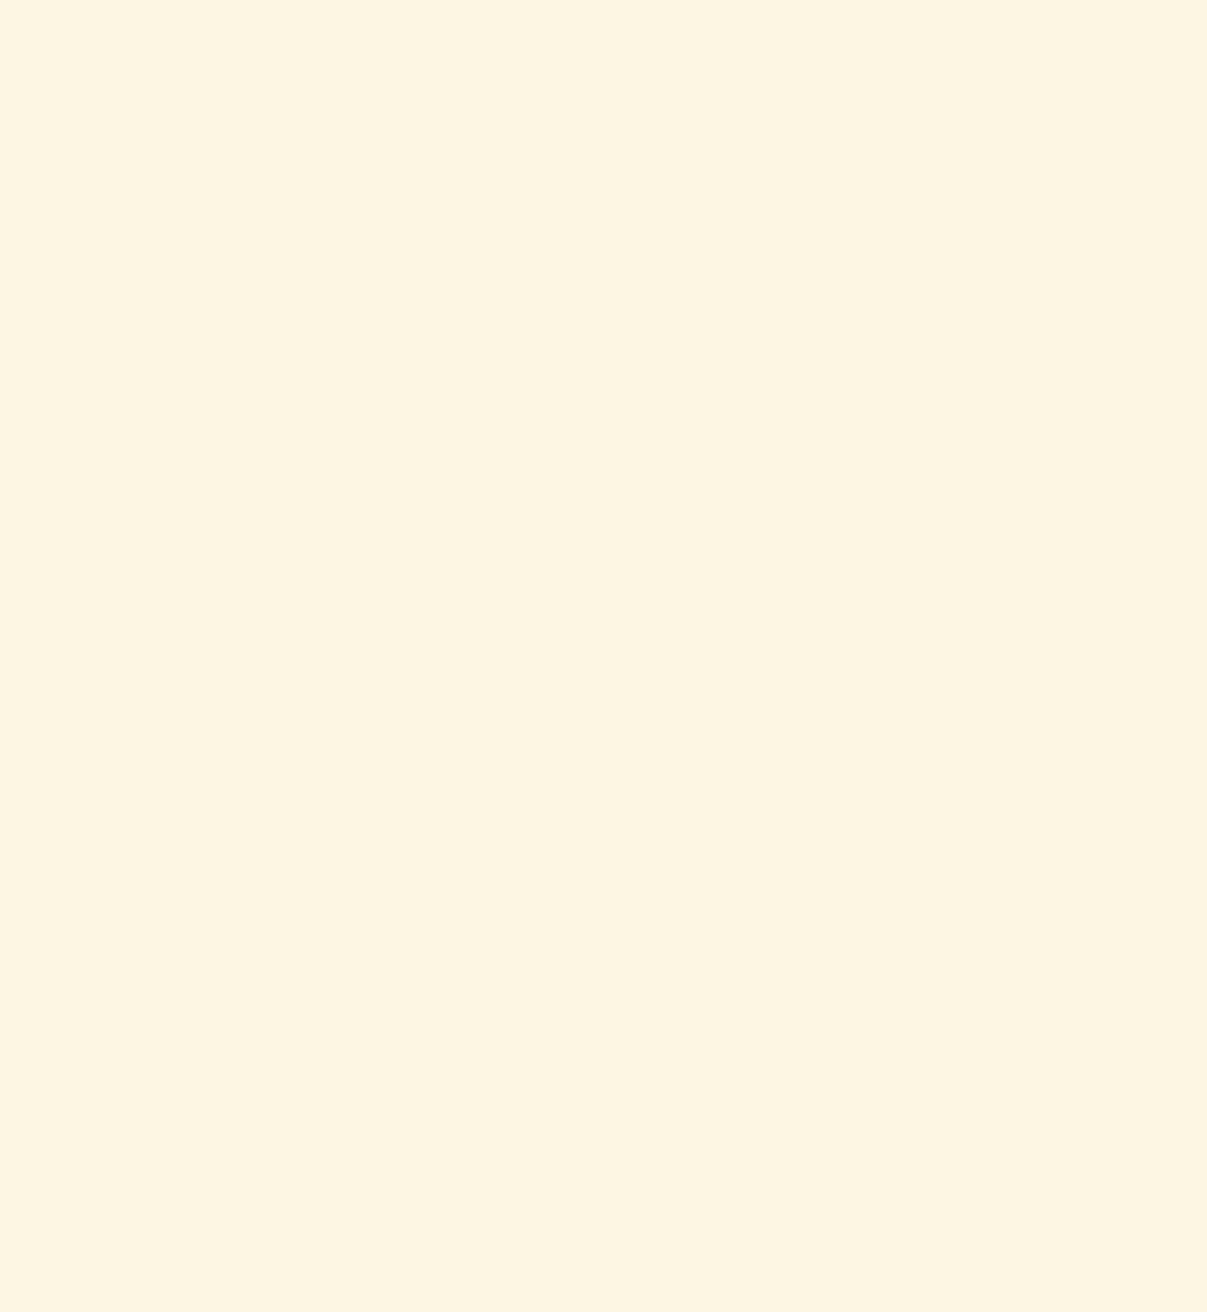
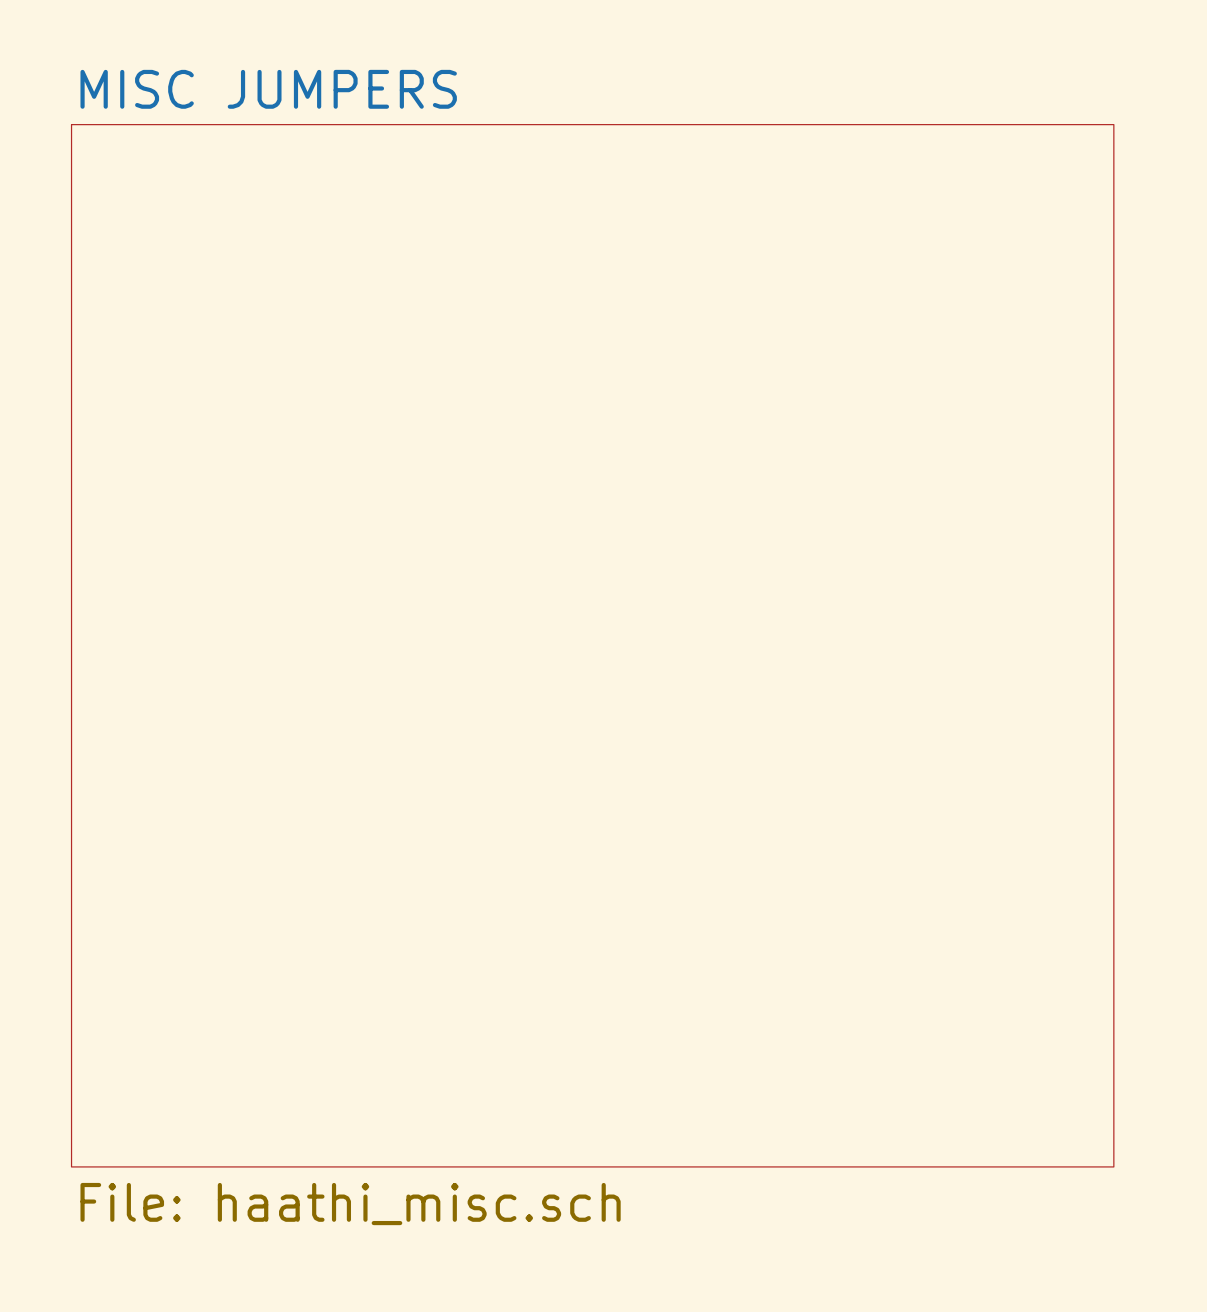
sheet MISC JUMPERS: none -> File: haathi_misc.sch (592, 645)

